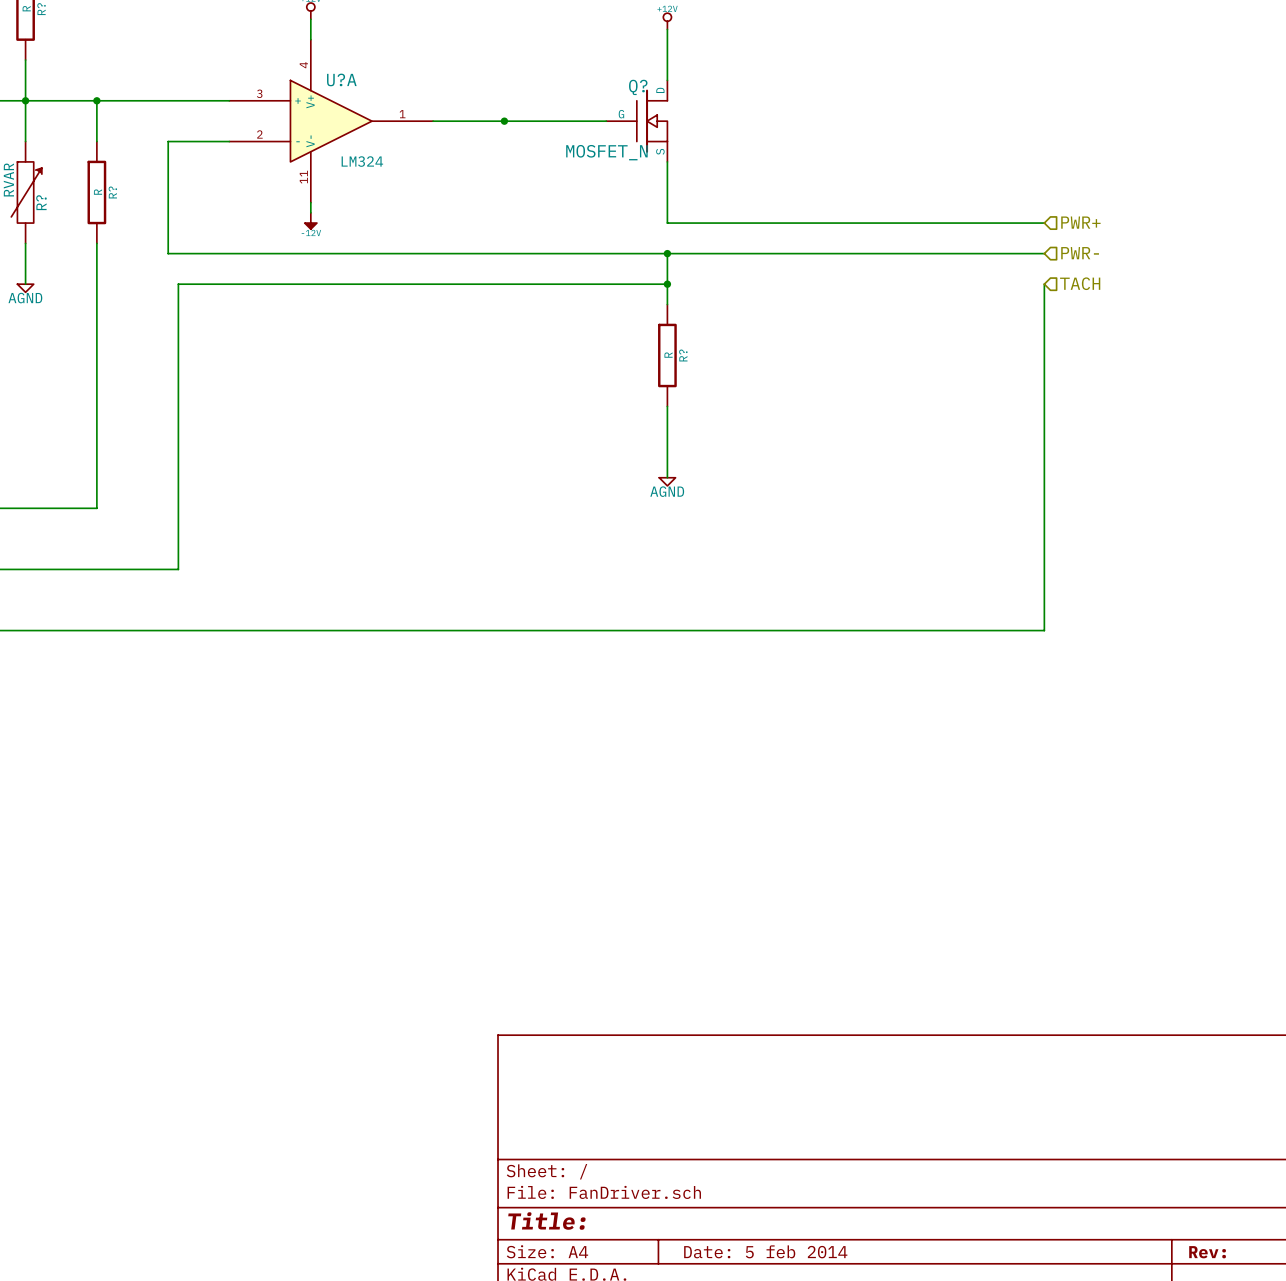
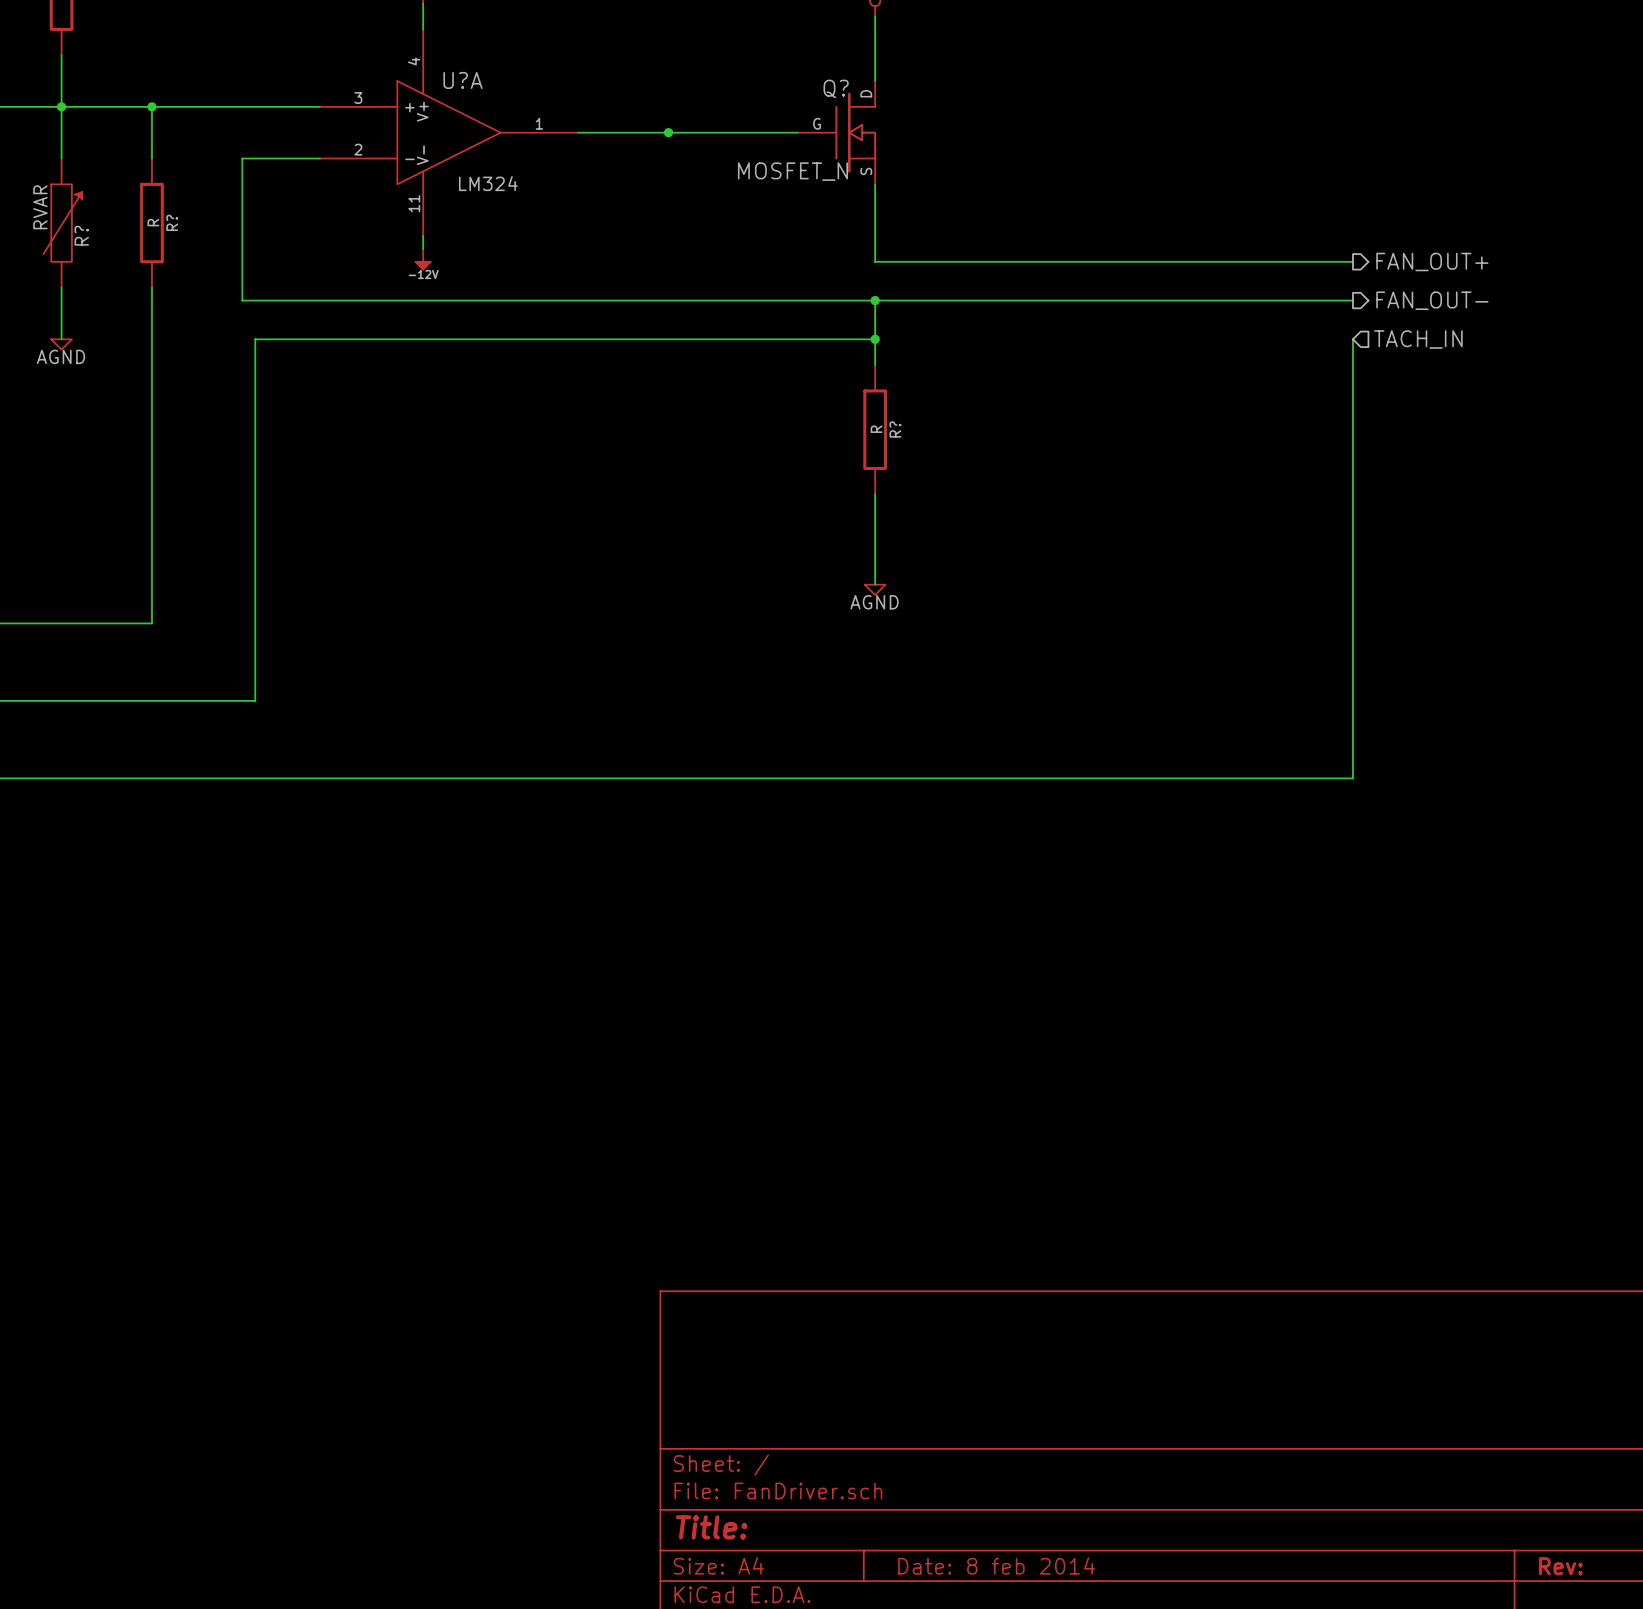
hierarchical label shape: input (1080, 222) -> output (1432, 261)
hierarchical label: PWR+ (1080, 222) -> FAN_OUT+ (1432, 261)
hierarchical label shape: input (1080, 253) -> output (1432, 300)
hierarchical label: PWR- (1080, 253) -> FAN_OUT- (1432, 300)
hierarchical label: TACH (1080, 283) -> TACH_IN (1418, 339)
title block: Date: 5 feb 2014 (765, 1251) -> Date: 8 feb 2014 (996, 1565)

